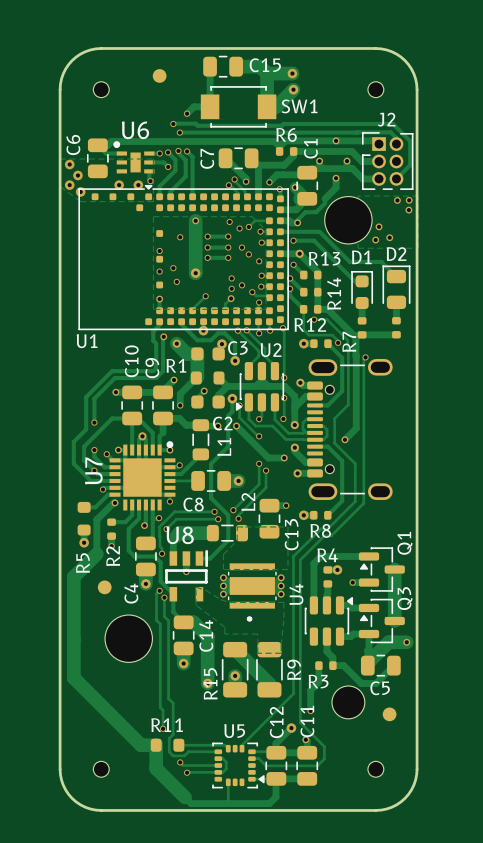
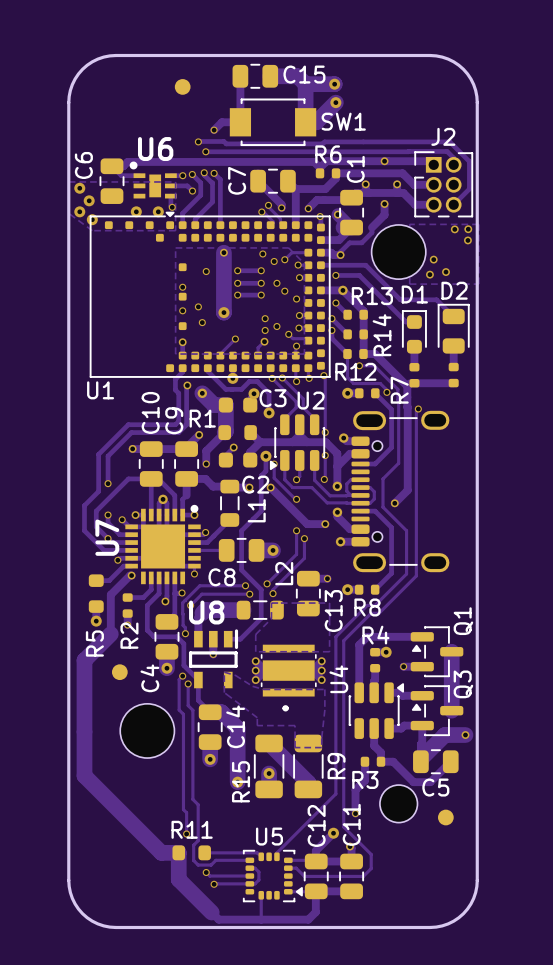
part: (101, 89) -> none
part: (375, 89) -> none
part: (101, 769) -> none
part: (375, 769) -> none

